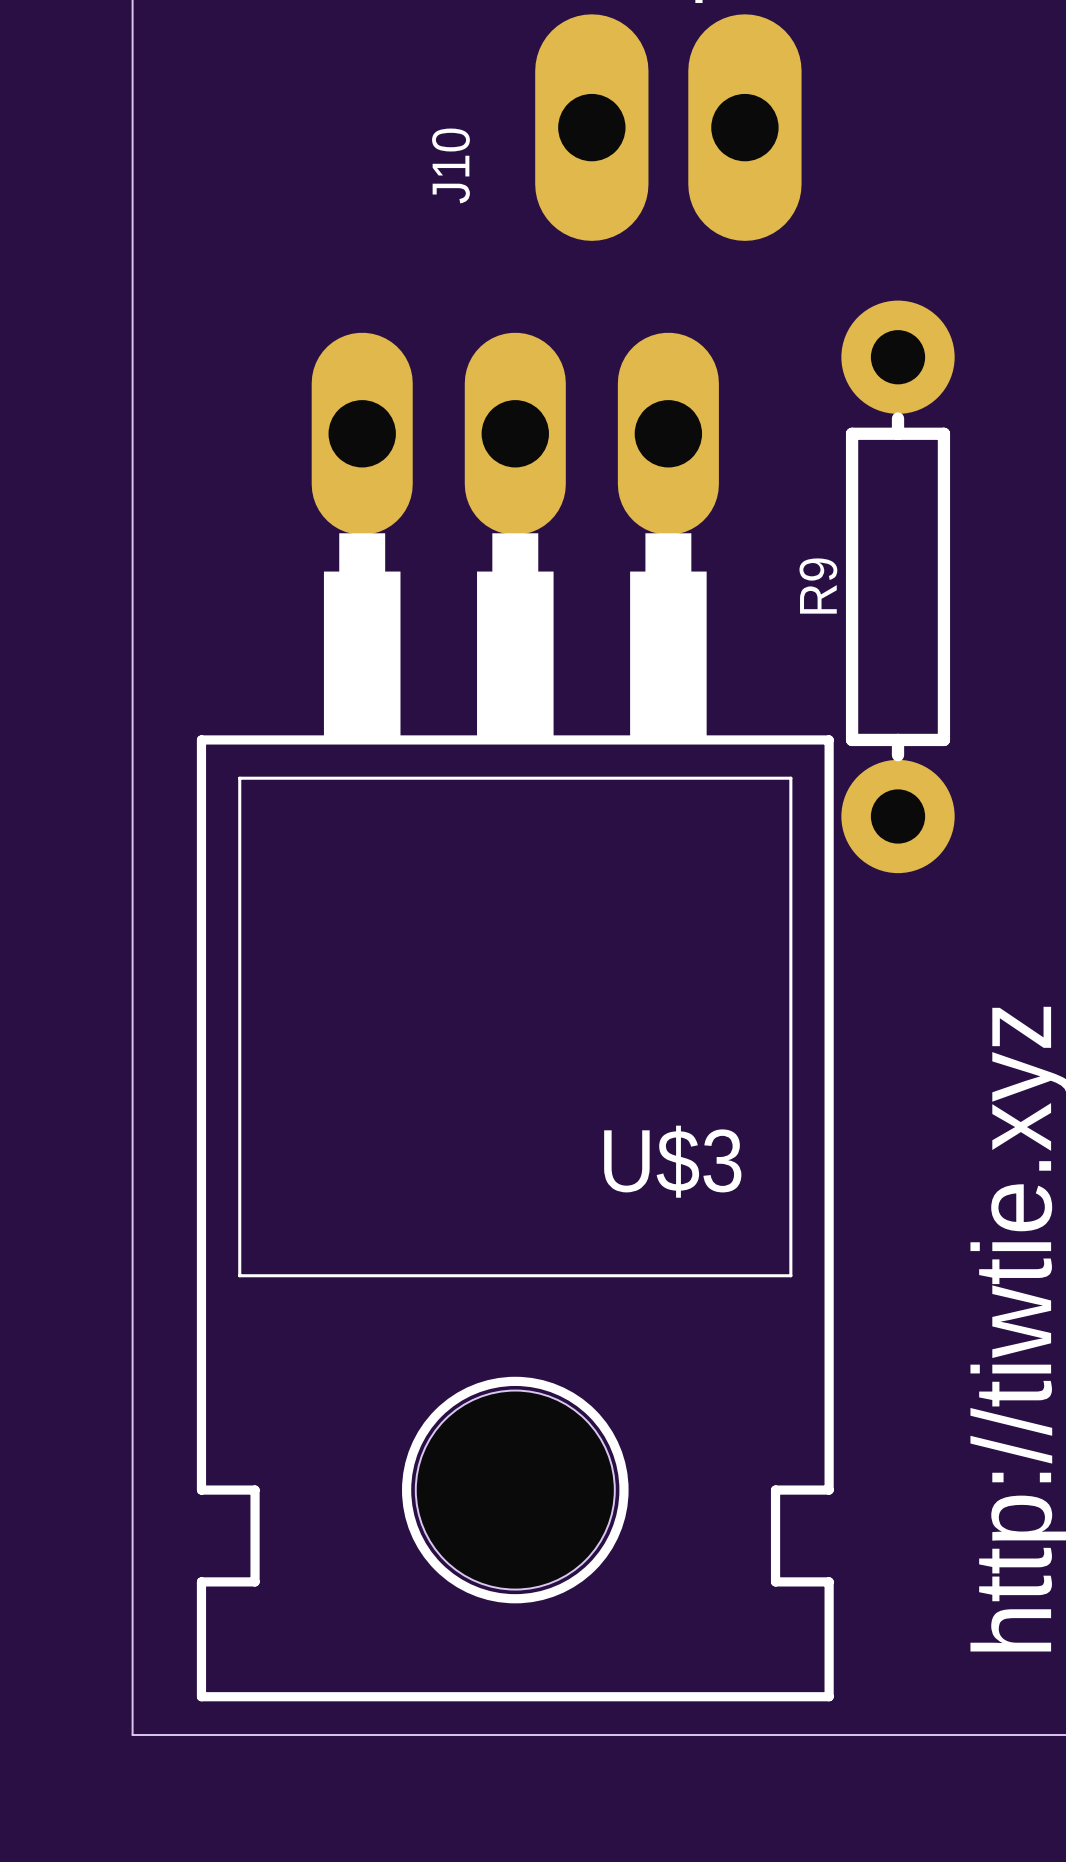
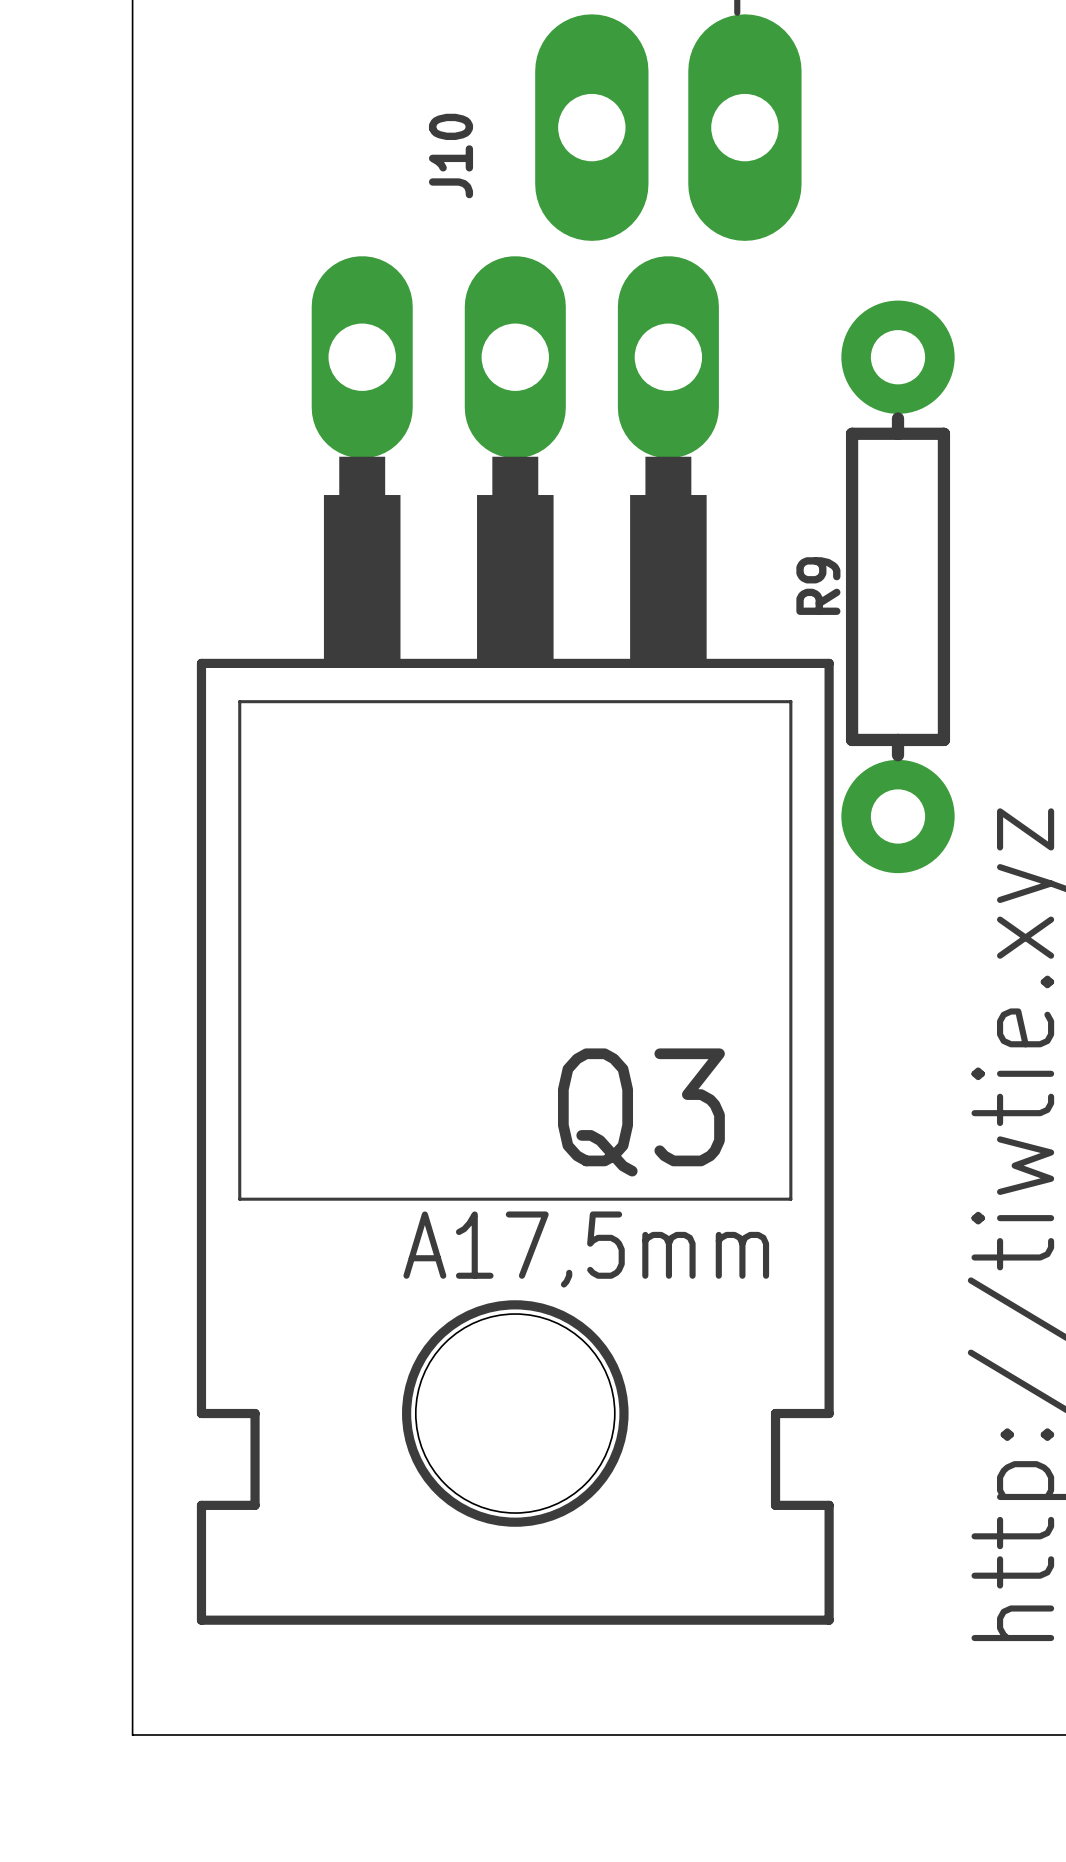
Q3: none -> (515, 940)
U$3: (515, 1017) -> none

